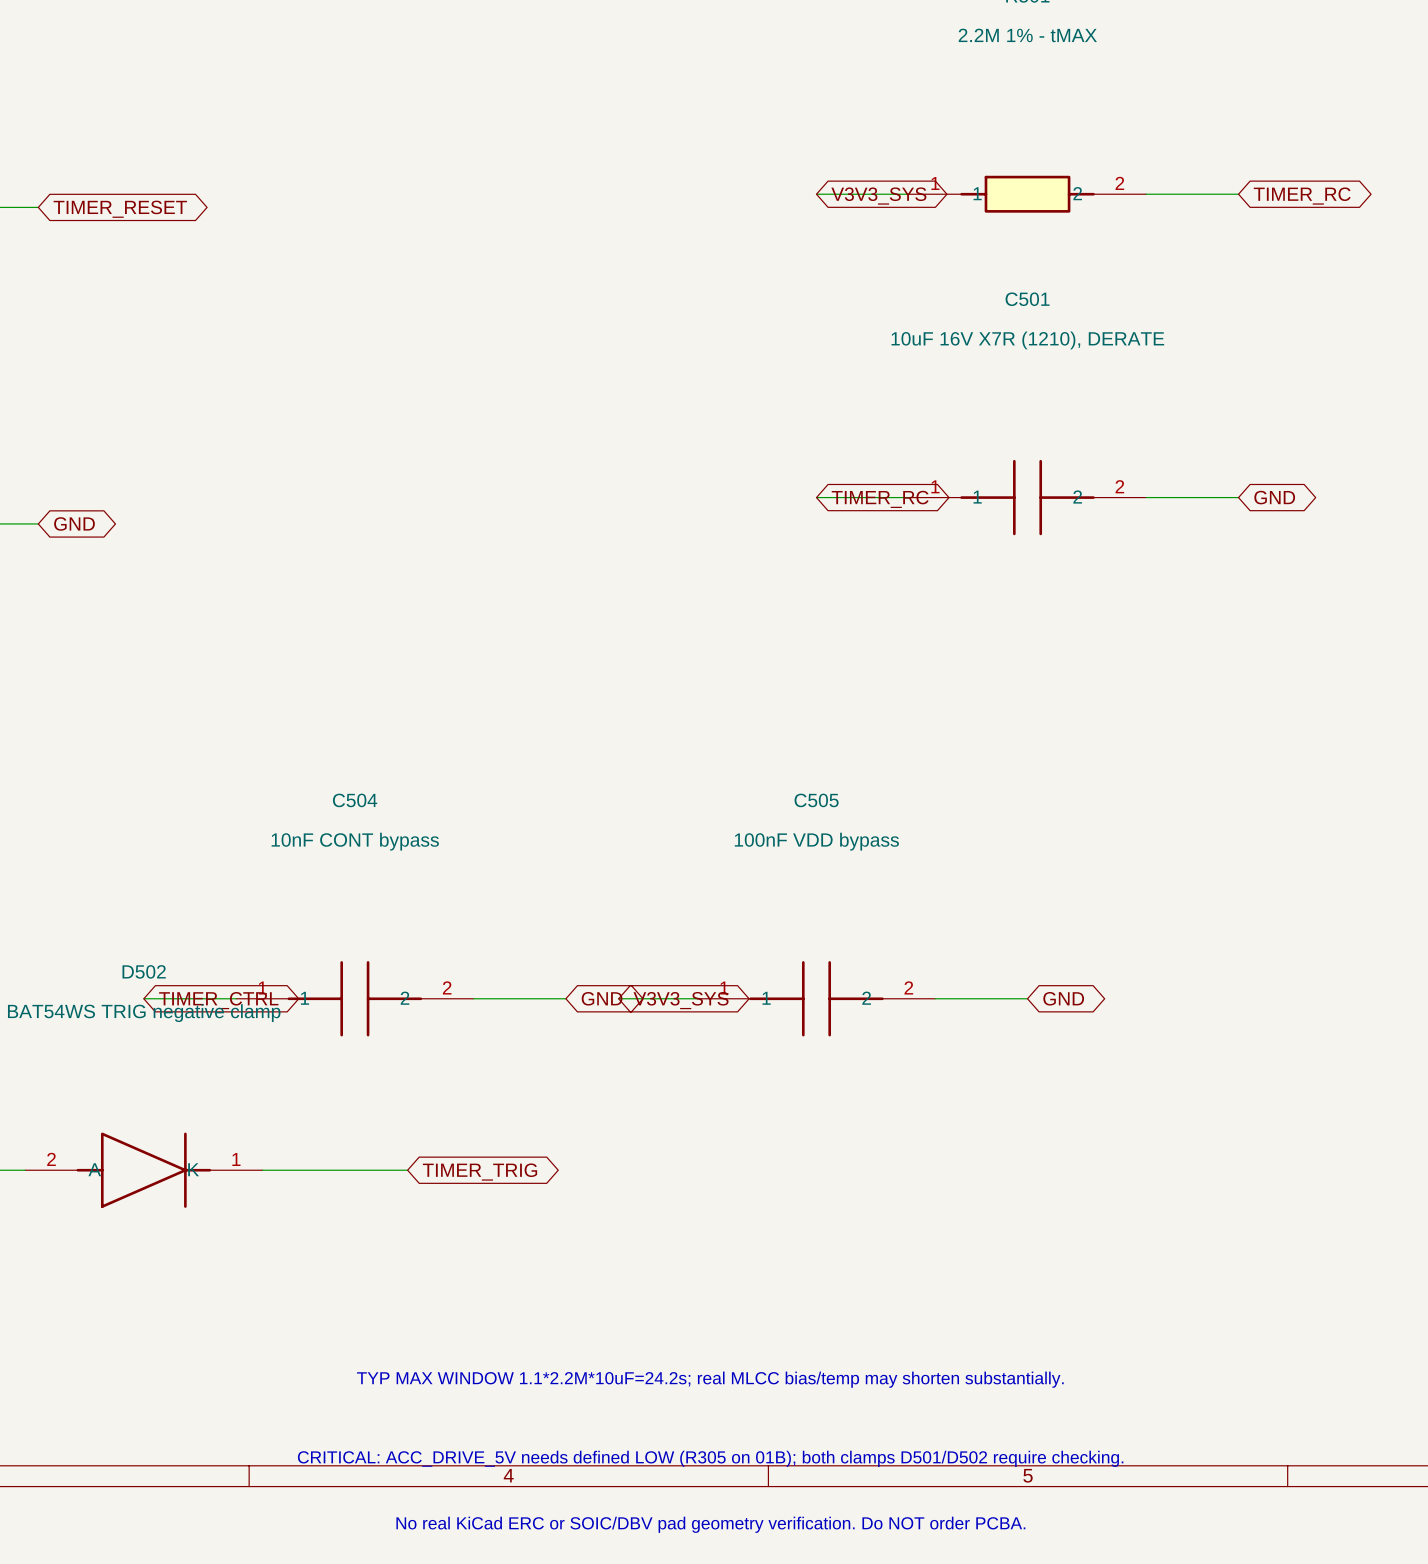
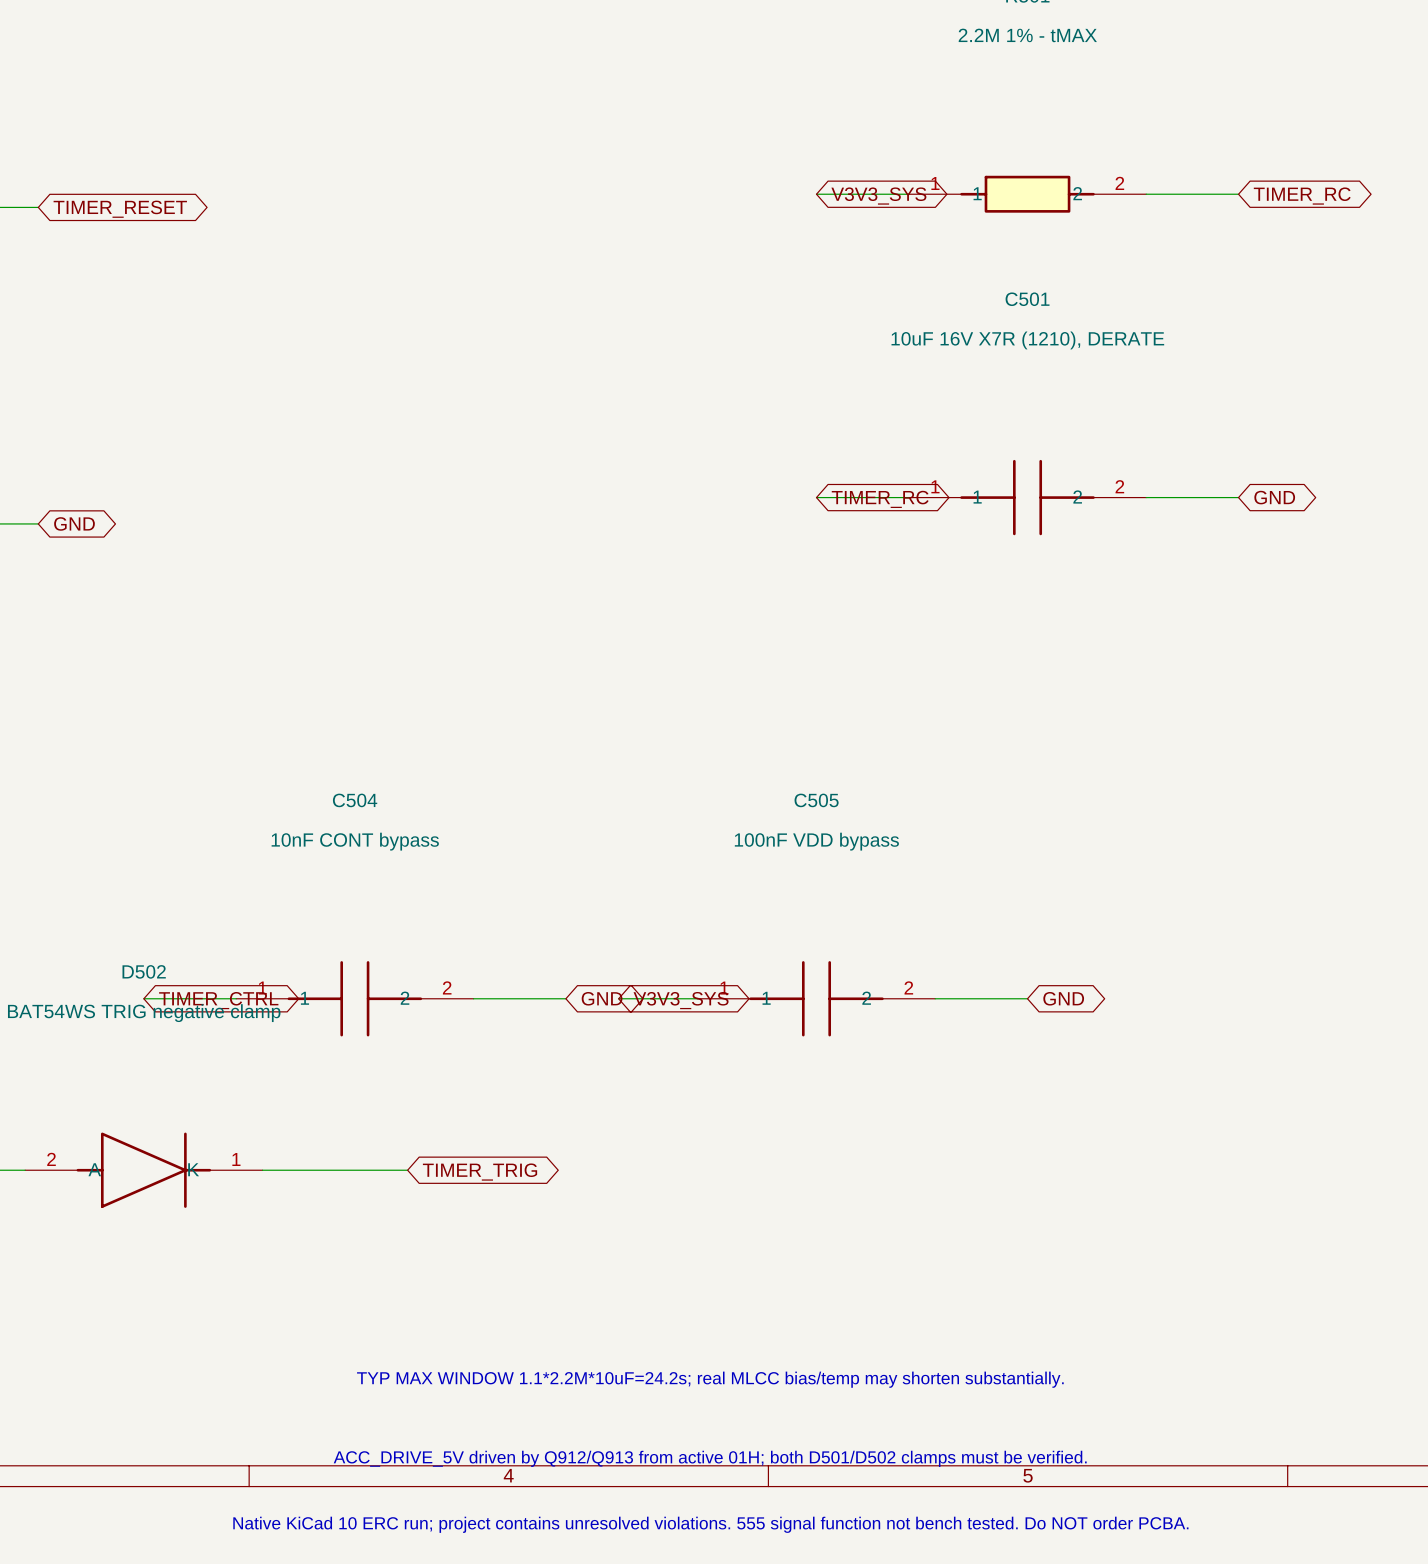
text: CRITICAL: ACC_DRIVE_5V needs defined LOW (R305 on 01B); both clamps D501/D502 require checking. (710, 1458) -> ACC_DRIVE_5V driven by Q912/Q913 from active 01H; both D501/D502 clamps must be verified. (710, 1458)
text: No real KiCad ERC or SOIC/DBV pad geometry verification. Do NOT order PCBA. (710, 1524) -> Native KiCad 10 ERC run; project contains unresolved violations. 555 signal function not bench tested. Do NOT order PCBA. (710, 1524)

